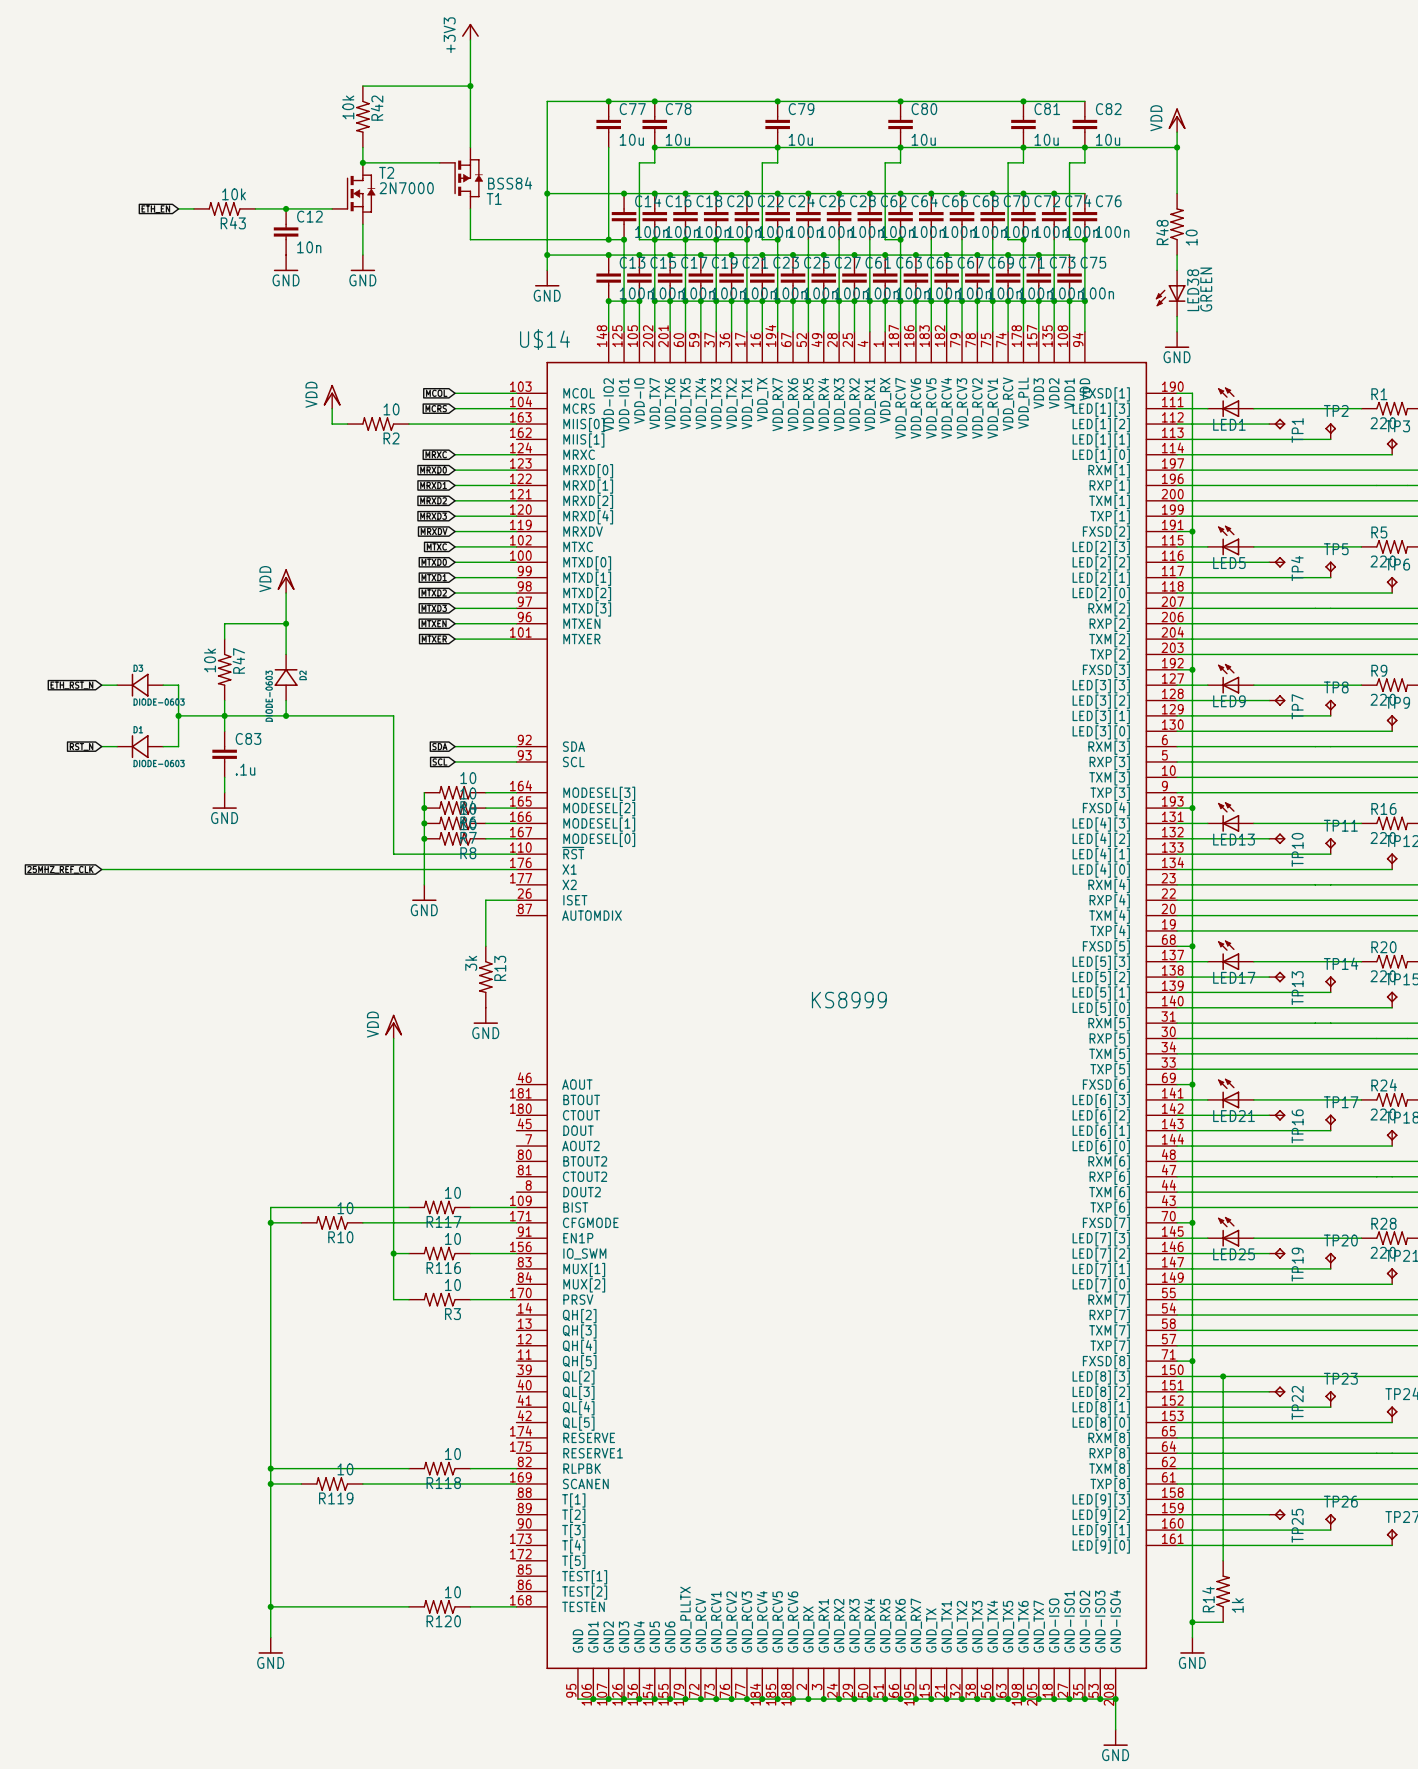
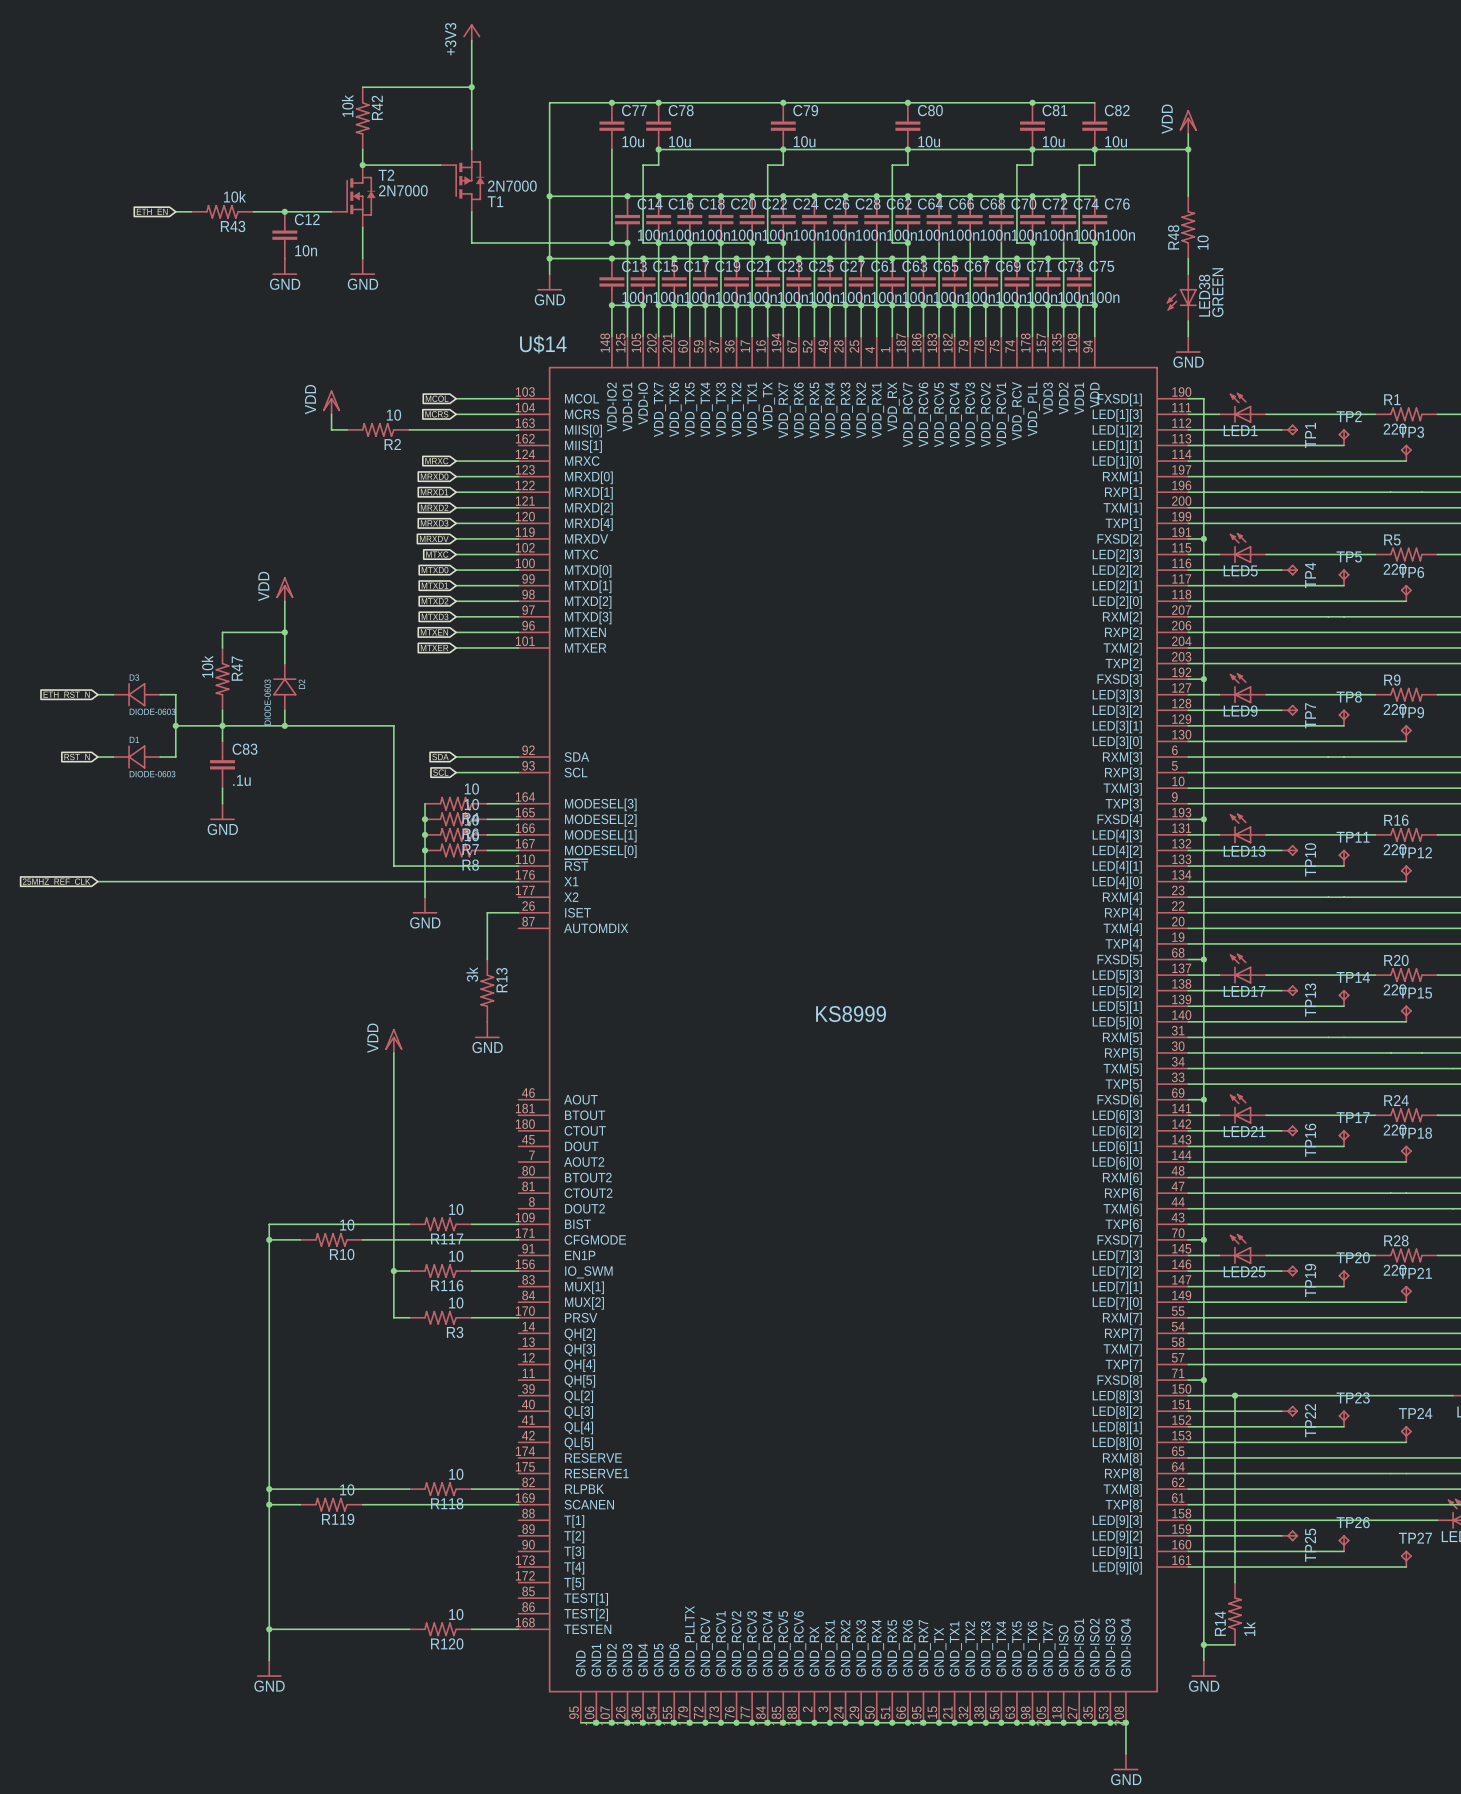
T1 value: BSS84 (510, 183) -> 2N7000 (512, 186)

